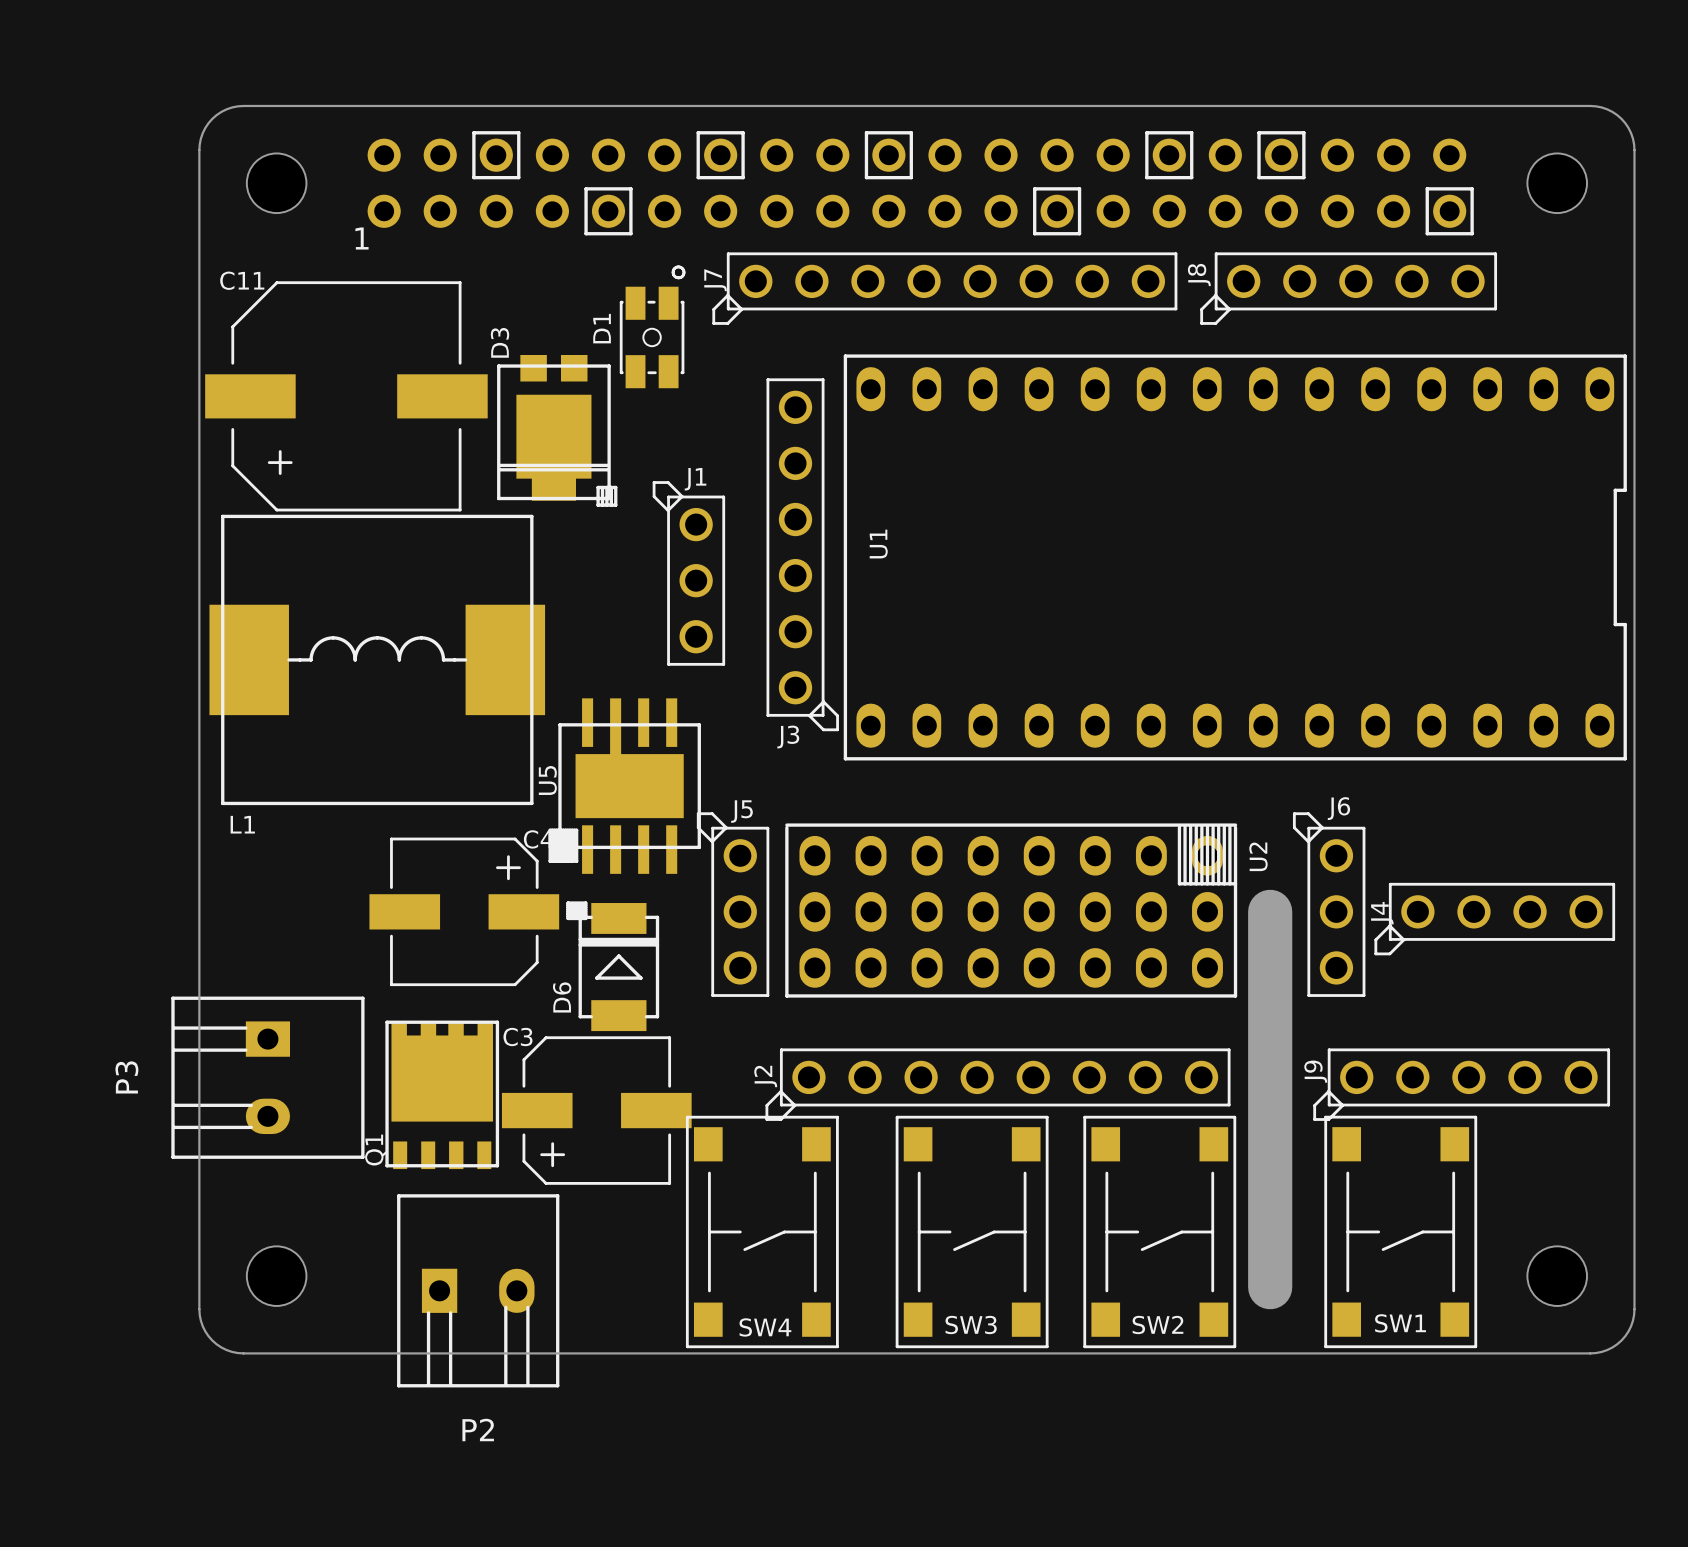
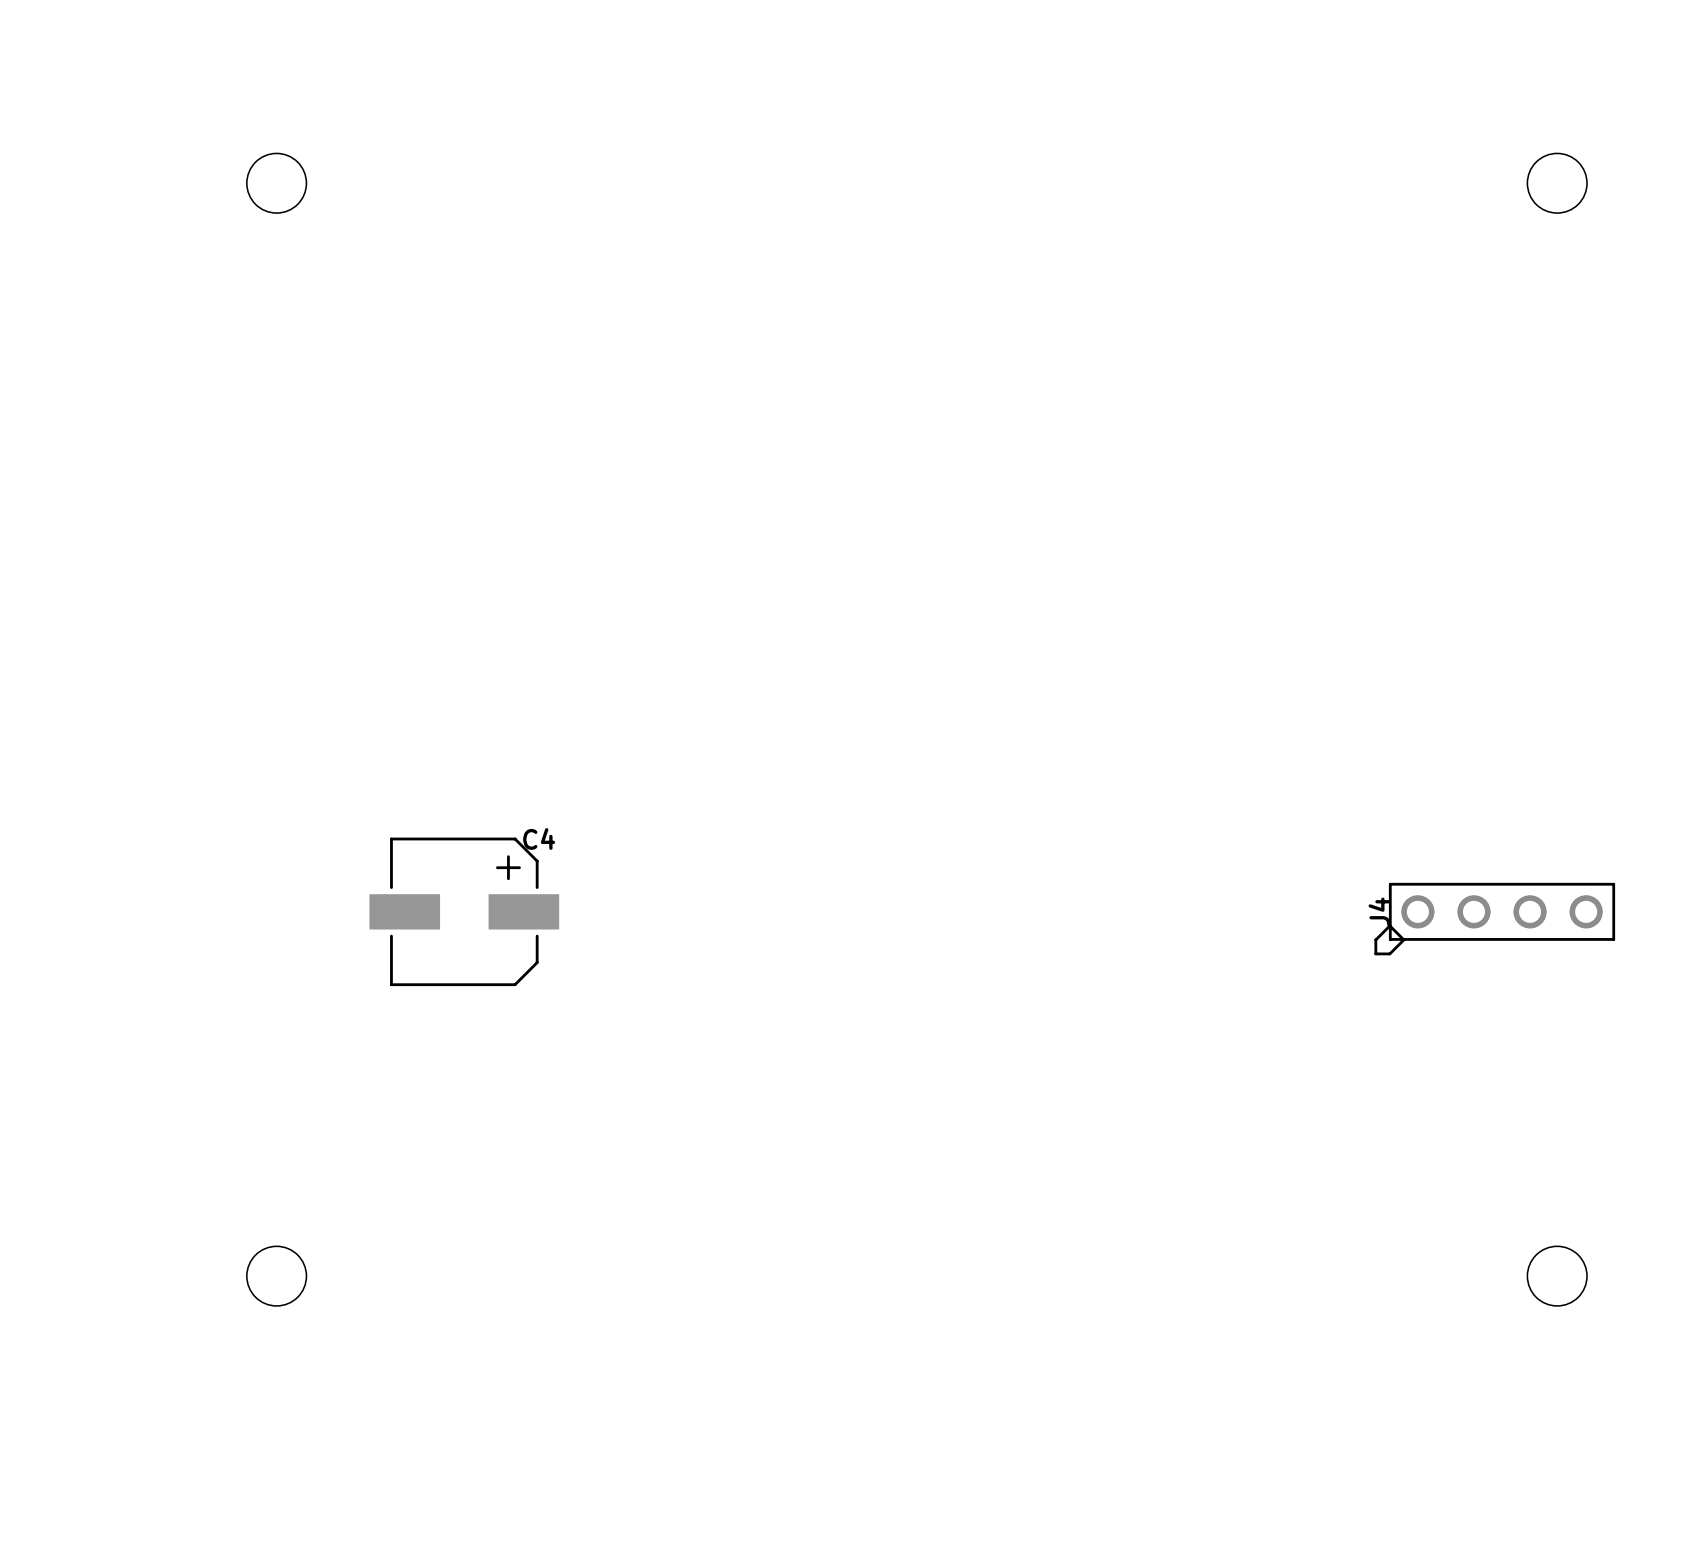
board edge: (243, 105) (1590, 105) (1607, 109) (1621, 118) (1631, 133) (1634, 150) (1634, 1309) (1631, 1326) (1621, 1340) (1607, 1350) (1590, 1353) (243, 1353) (226, 1350) (212, 1340) (202, 1326) (199, 1309) (199, 150) (202, 133) (212, 118) (226, 109) (243, 105) -> none
part: (920, 183) -> none
J7: (944, 288) -> none
J8: (1348, 288) -> none
D1: (652, 326) -> none
C11: (346, 396) -> none
D3: (557, 430) -> none
J3: (802, 554) -> none
U1: (1235, 557) -> none
J1: (688, 573) -> none
L1: (377, 659) -> none
U5: (624, 786) -> none
J5: (733, 904) -> none
J6: (1329, 904) -> none
U2: (1011, 910) -> none
board edge: (1270, 911) (1270, 1287) -> none
D6: (612, 966) -> none
P3: (267, 1077) -> none
J2: (998, 1084) -> none
J9: (1461, 1084) -> none
Q1: (442, 1094) -> none
C3: (596, 1110) -> none
SW4: (762, 1231) -> none
SW3: (972, 1231) -> none
SW2: (1159, 1231) -> none
SW1: (1400, 1231) -> none
P2: (478, 1290) -> none

